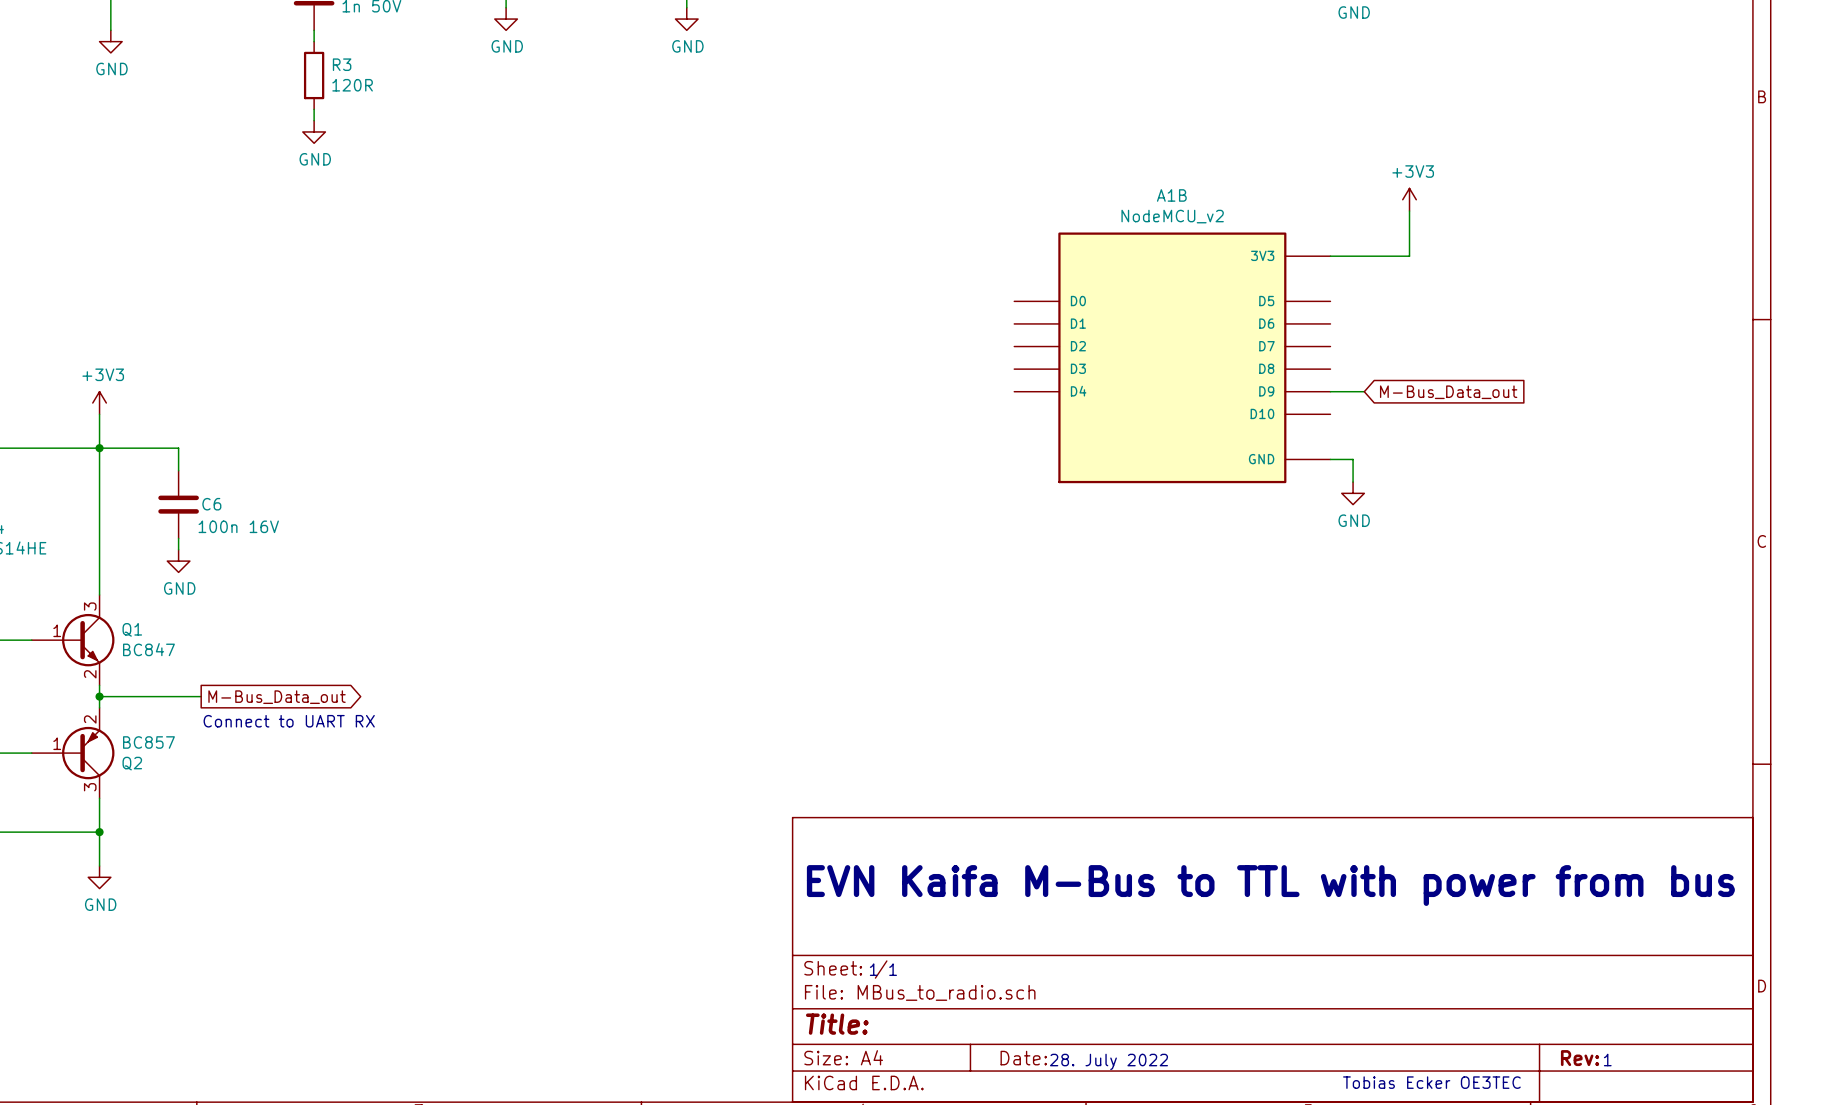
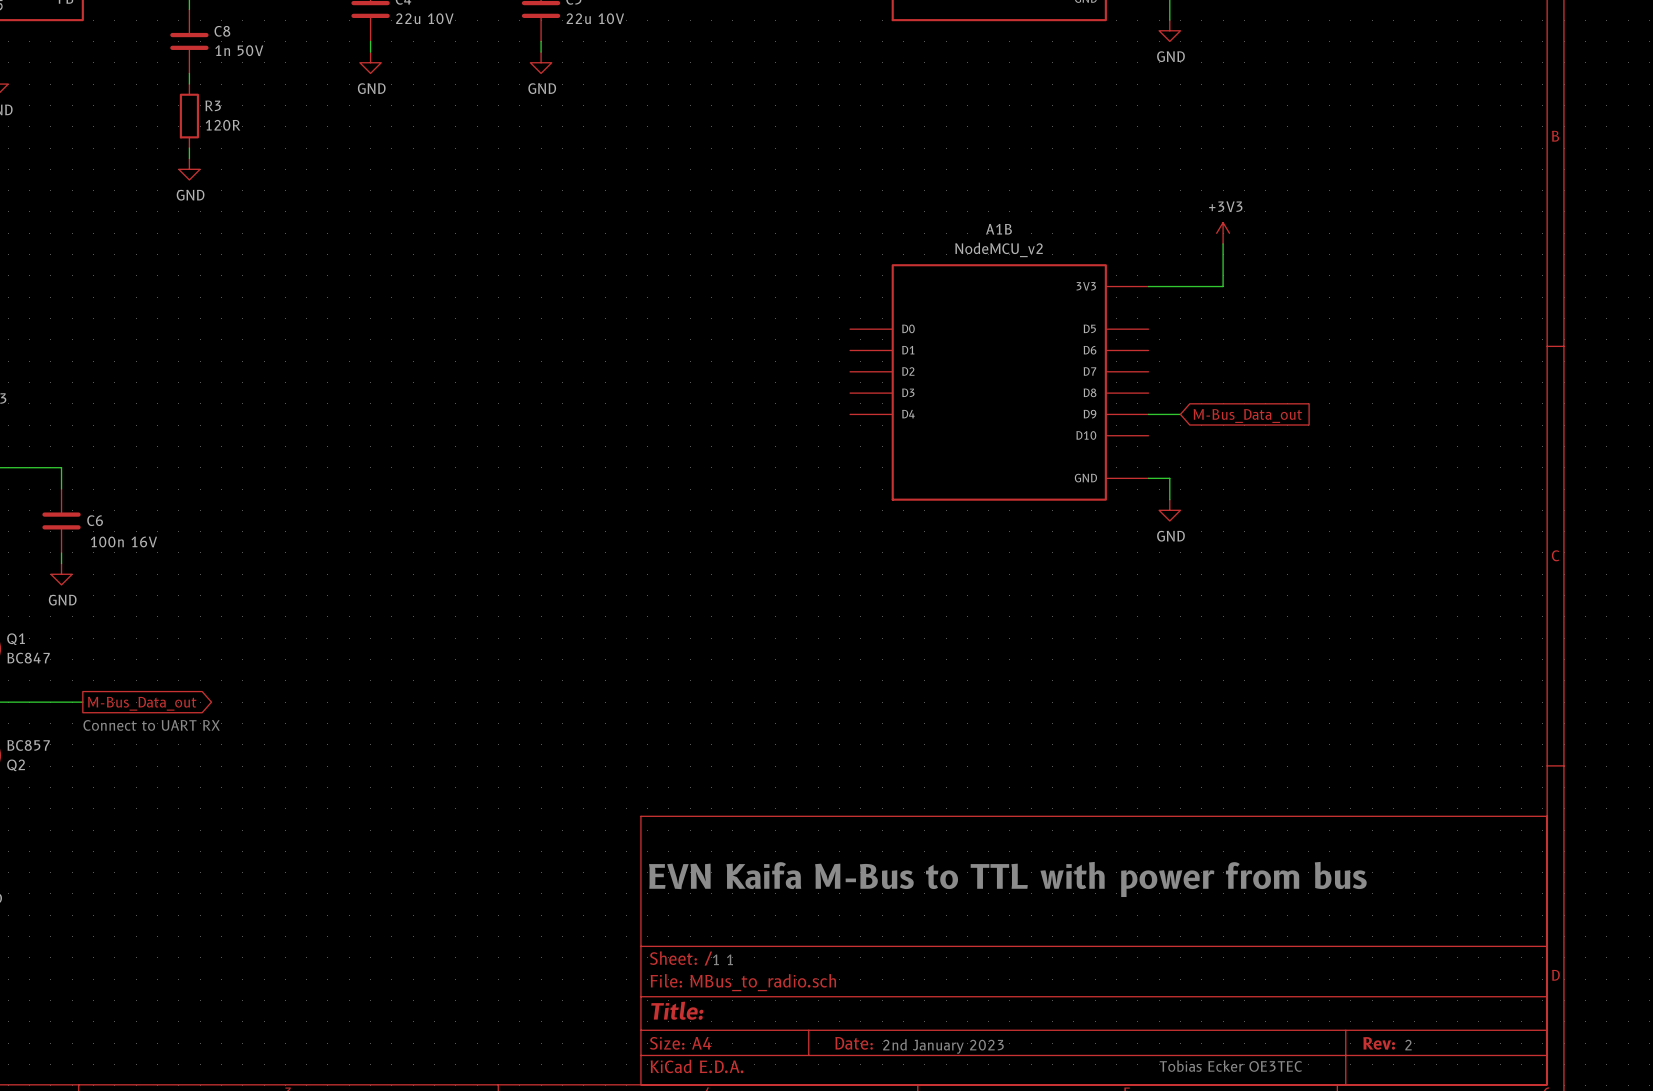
text: 1 (1607, 1060) -> 2 (1408, 1045)
text: 28. July 2022 (1108, 1061) -> 2nd January 2023 (943, 1046)

